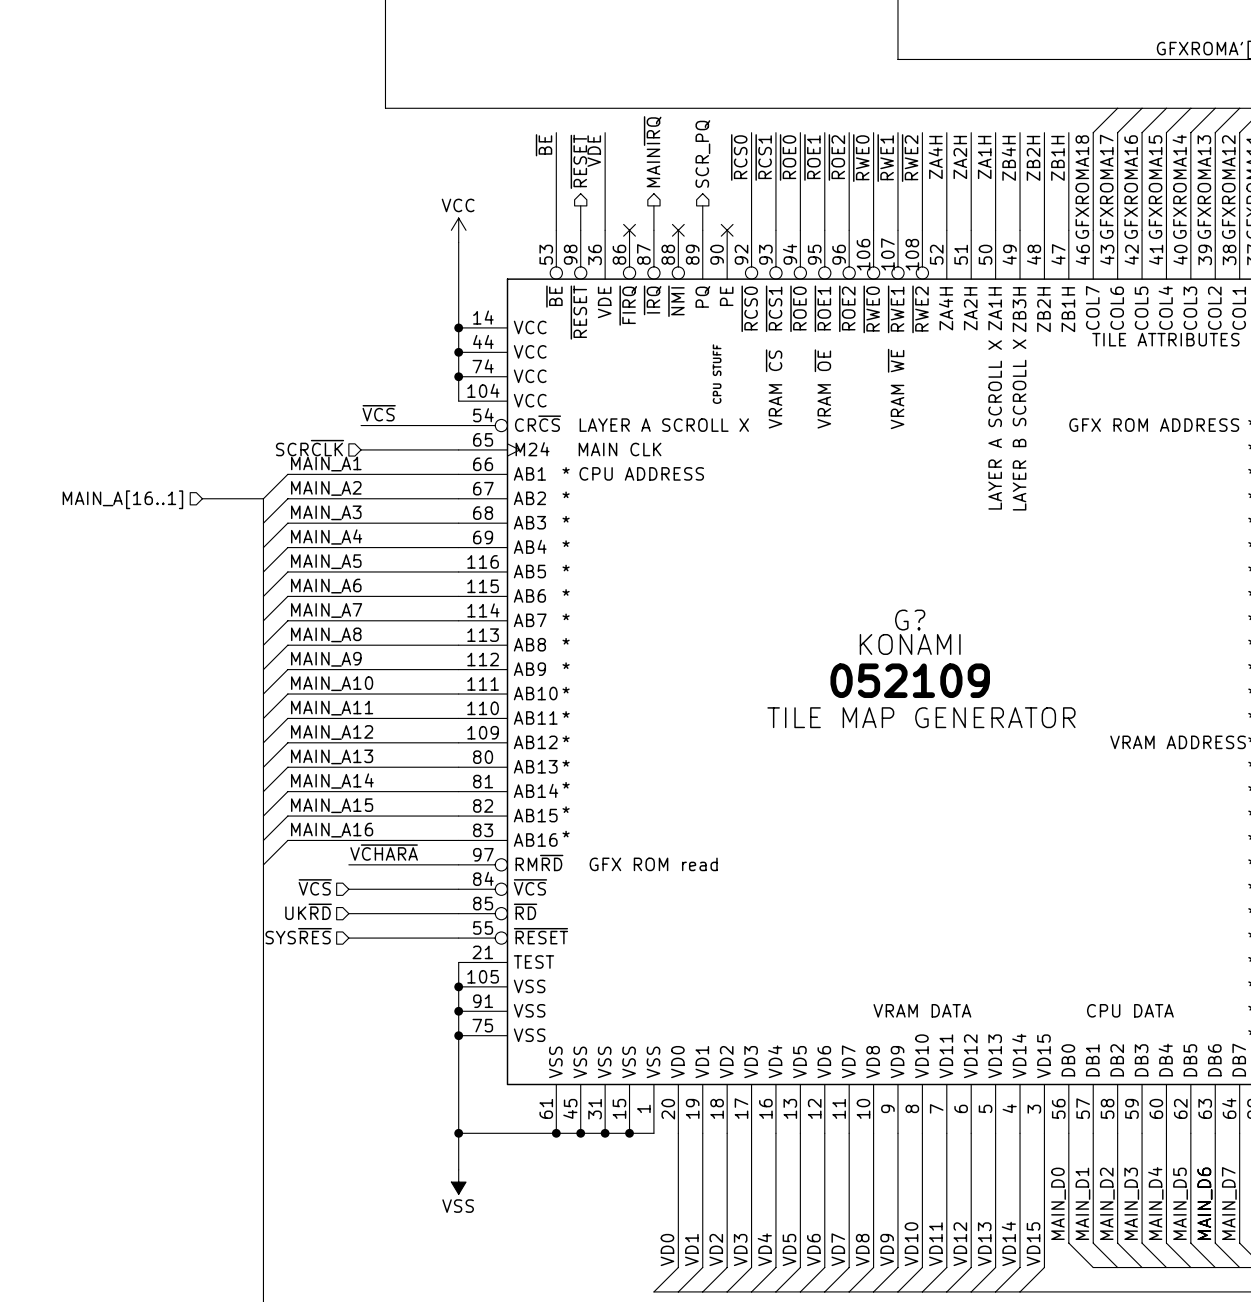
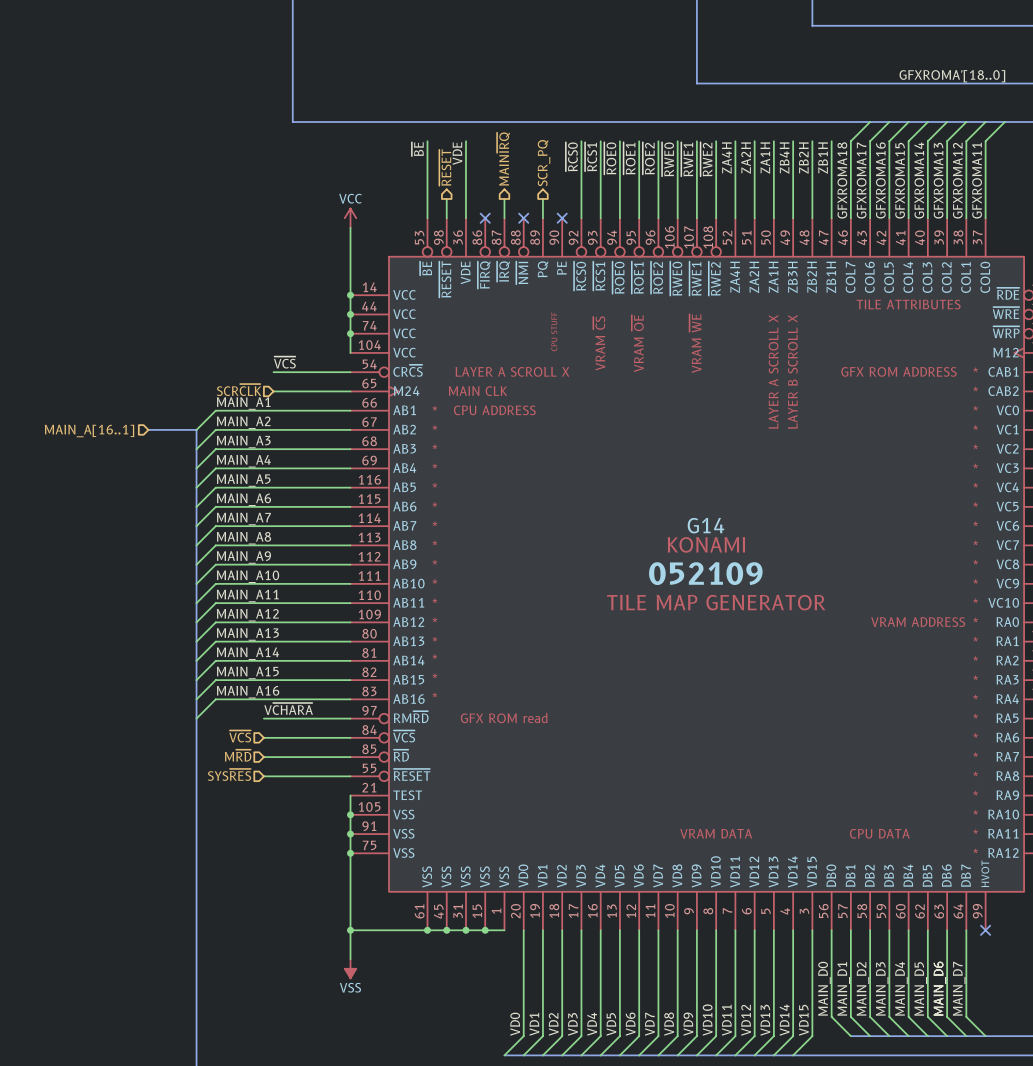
G? name: G? (910, 620) -> G14 (705, 525)
hierarchical label: UK~{RD} (308, 911) -> M~{RD} (238, 755)

